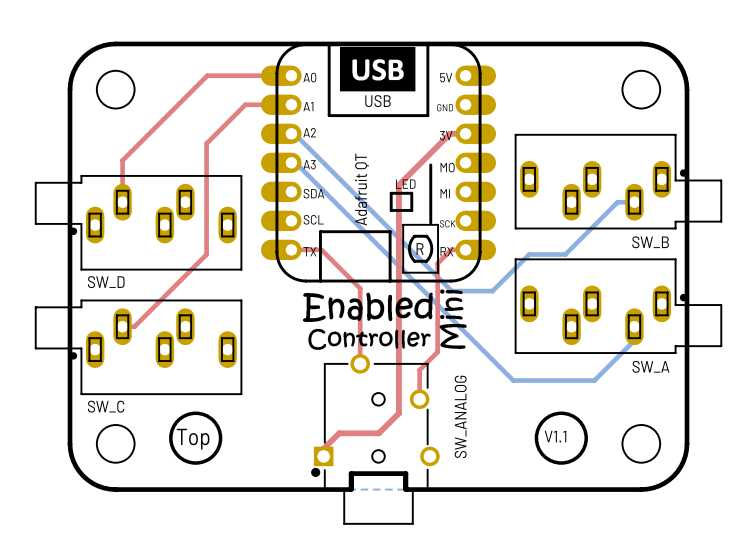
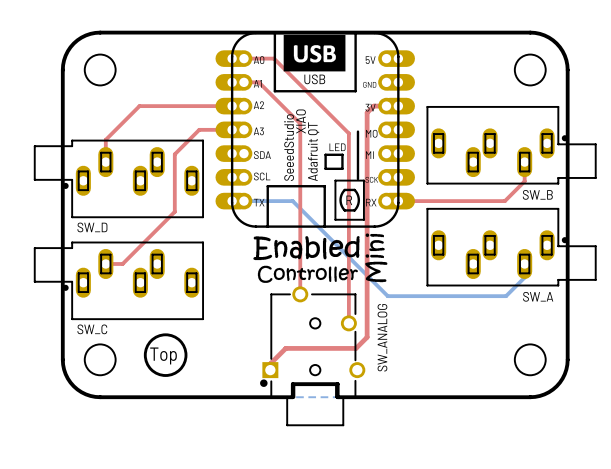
part footprint: [260, 43, 497, 283] -> [215, 31, 415, 228]
top track: (276, 75) (207, 75) (122, 160) (122, 175) -> (243, 106) (139, 106) (105, 139)
top track: (276, 104) (245, 104) (206, 143) (206, 254) (134, 326) -> (243, 129) (199, 129) (174, 154) (174, 211) (122, 263) (115, 263)
bottom track: (291, 133) (294, 133) (451, 291) (492, 291) (529, 254) (565, 254) (617, 202) (634, 202) -> none
top track: (441, 141) (398, 185) (398, 413) (378, 433) (339, 433) -> (367, 112) (367, 337) (356, 348) (285, 348) (283, 351)
bottom track: (291, 162) (295, 162) (513, 380) (594, 380) (634, 340) -> (232, 201) (292, 201) (387, 296) (506, 296) (524, 277) (524, 275)
top track: none -> (524, 162) (524, 181) (504, 201) (386, 201)
top track: (291, 249) (321, 249) (360, 288) -> (243, 82) (258, 82) (300, 123) (300, 232)
top track: (465, 249) (451, 249) (437, 263) (437, 352) (419, 370) -> (243, 58) (274, 58) (348, 133) (348, 299)
drawing: [534, 411, 588, 465] -> none
text: V1.1 (555, 436) -> none

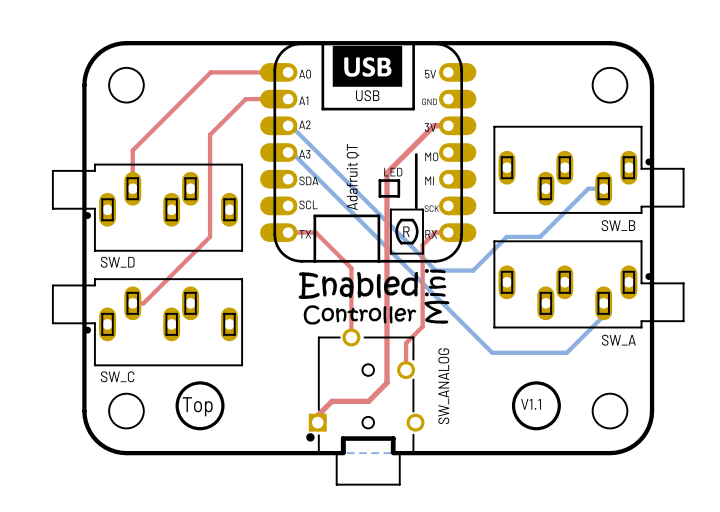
part footprint: [215, 31, 415, 228] -> [260, 42, 477, 263]
top track: (243, 58) (274, 58) (348, 133) (348, 299) -> (448, 232) (435, 232) (422, 245) (422, 326) (406, 343)
top track: (243, 82) (258, 82) (300, 123) (300, 232) -> (288, 232) (315, 232) (351, 268)
top track: (243, 106) (139, 106) (105, 139) -> (274, 72) (210, 72) (132, 150) (132, 163)
bottom track: none -> (288, 125) (290, 125) (435, 270) (473, 270) (506, 236) (540, 236) (588, 188) (603, 188)
top track: (367, 112) (367, 337) (356, 348) (285, 348) (283, 351) -> (426, 133) (387, 172) (387, 382) (368, 401) (331, 401)
top track: (243, 129) (199, 129) (174, 154) (174, 211) (122, 263) (115, 263) -> (274, 99) (245, 99) (210, 134) (210, 236) (143, 303)
top track: (524, 162) (524, 181) (504, 201) (386, 201) -> none
bottom track: (232, 201) (292, 201) (387, 296) (506, 296) (524, 277) (524, 275) -> (288, 152) (291, 152) (492, 352) (566, 352) (603, 315)
drawing: none -> [511, 381, 561, 431]
text: none -> V1.1 (531, 404)

